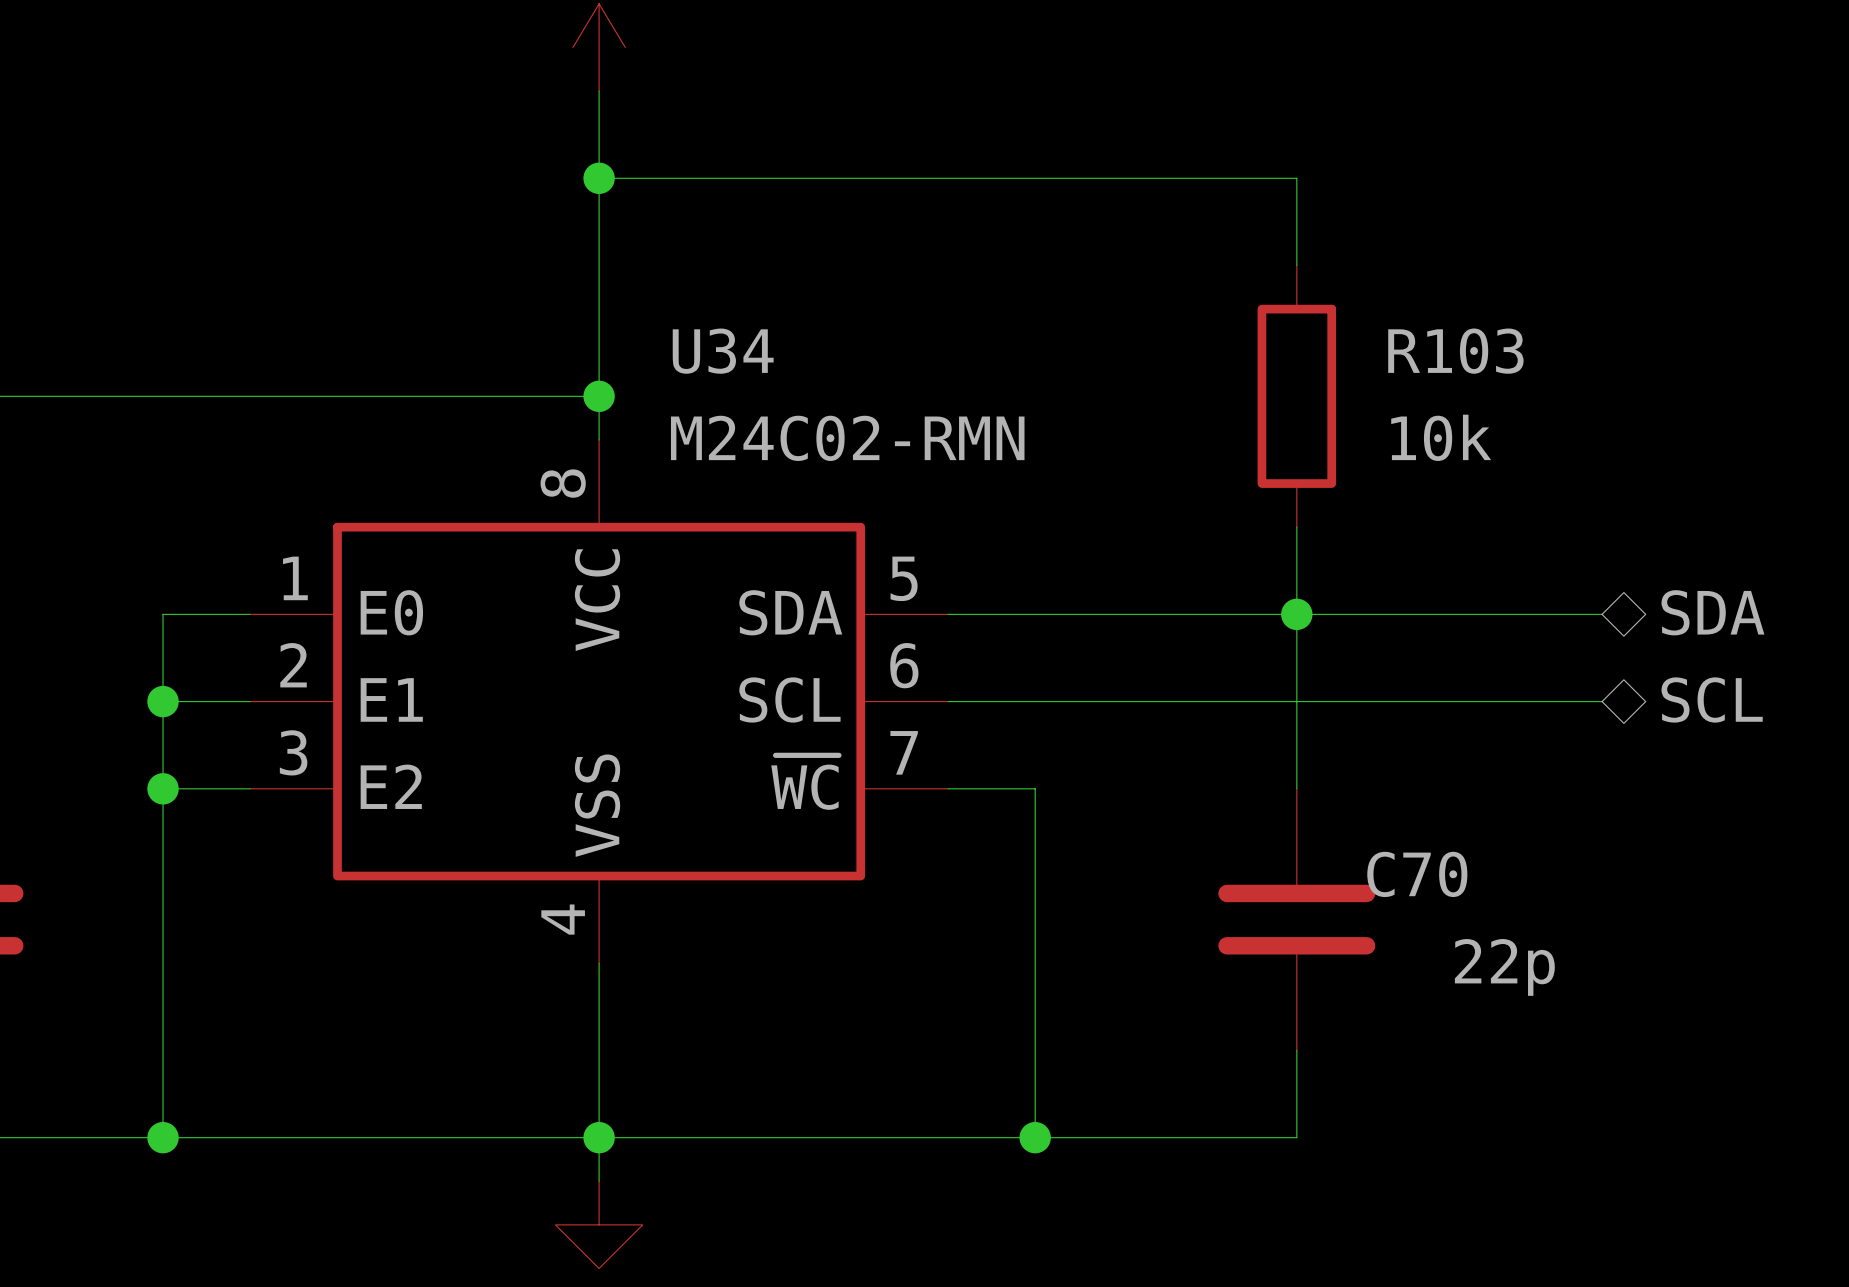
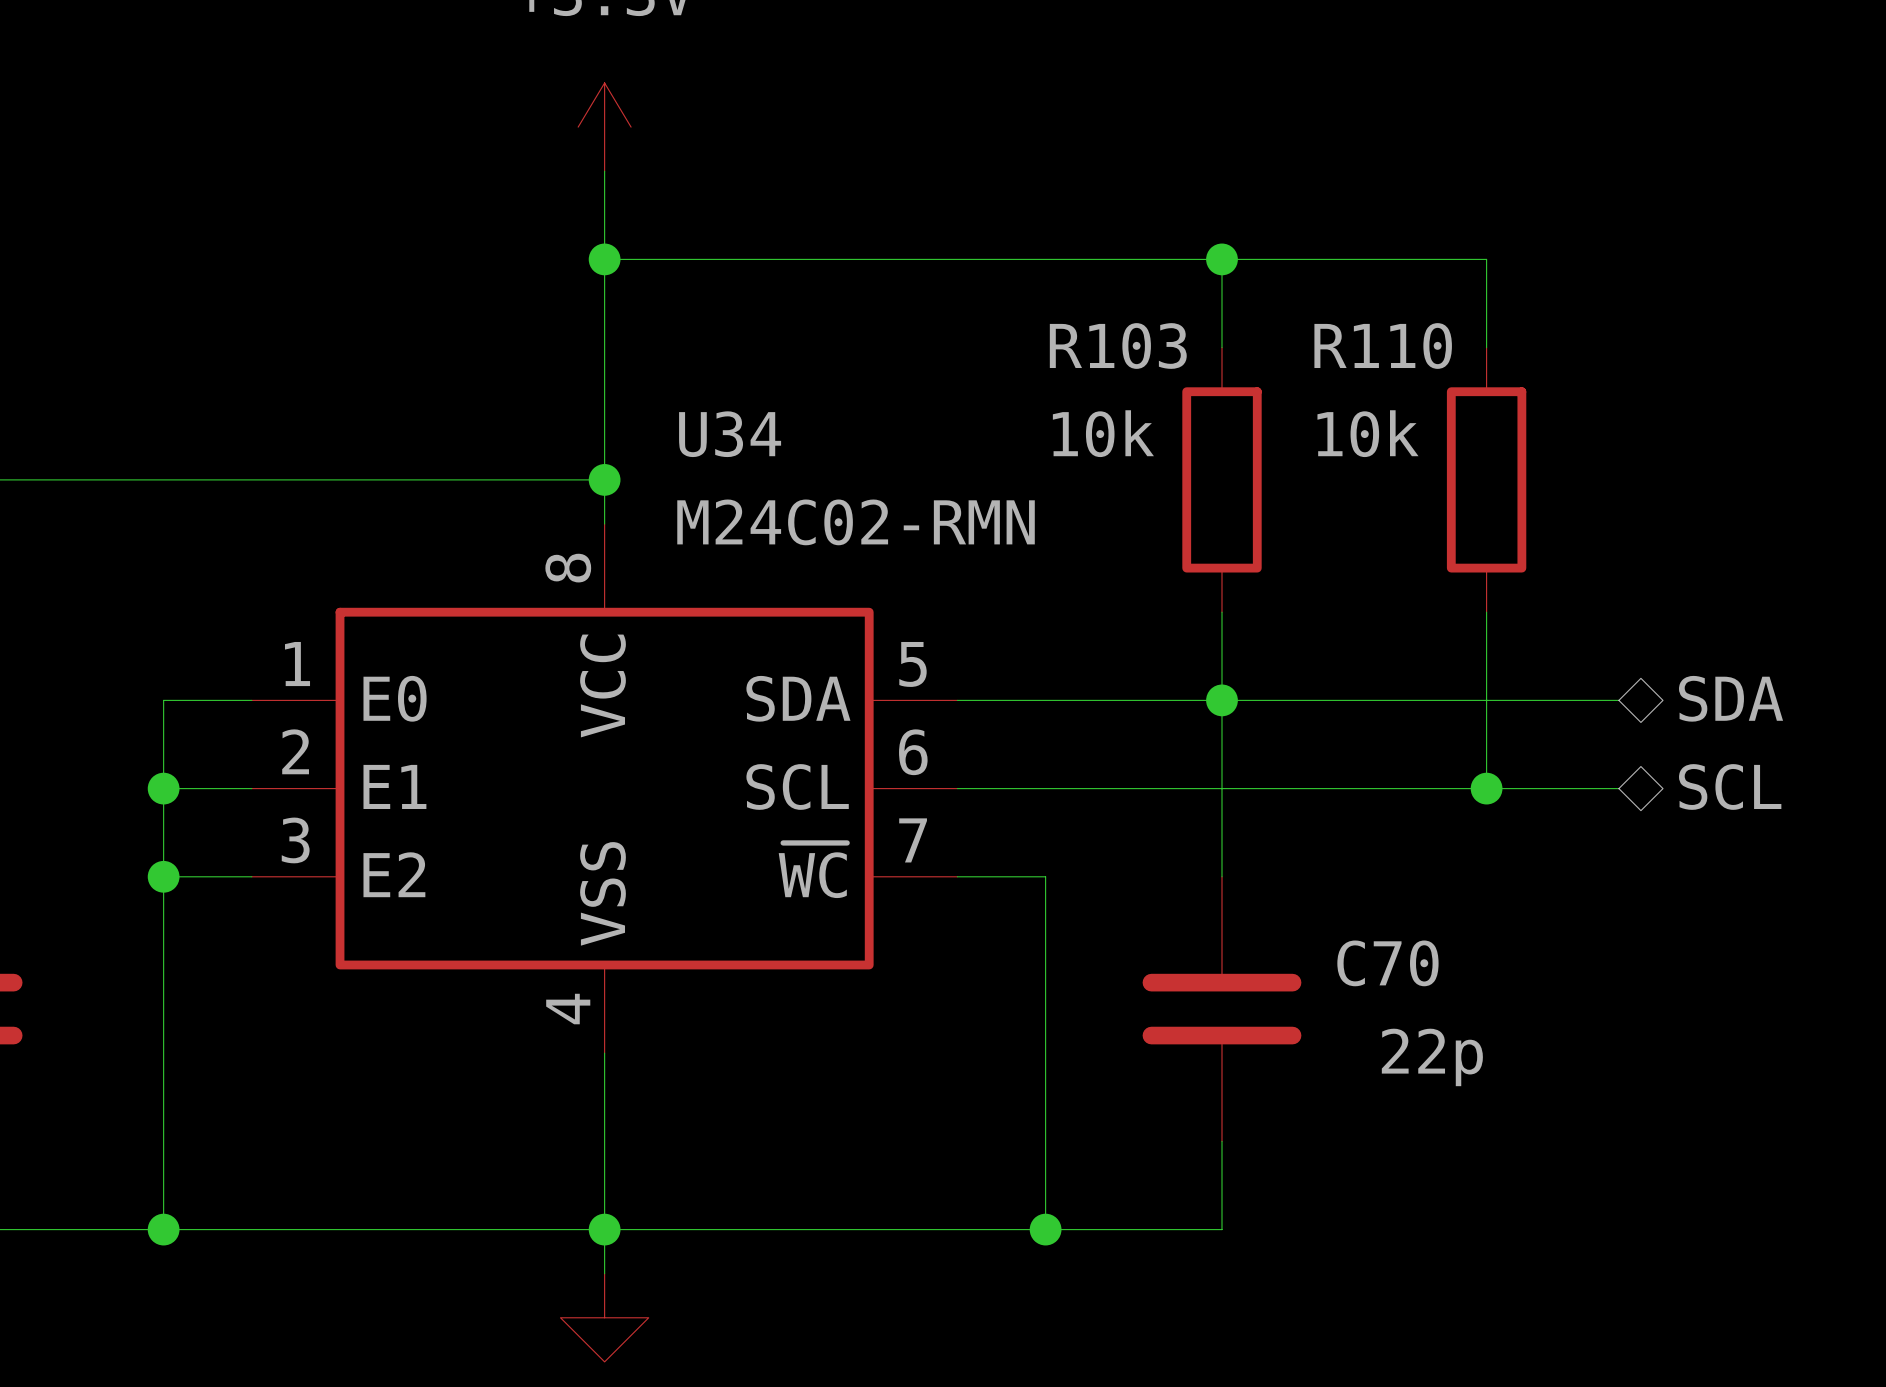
wire: none -> (1222, 259) (1222, 347)
junction: none -> (1222, 259)
wire: (1296, 178) (1296, 265) -> (1310, 259) (1486, 259) (1486, 347)
R103 name position: R103 (1455, 351) -> R103 (1118, 345)
R103 position: (1296, 396) -> (1222, 479)
R110: none -> 10k (1486, 479)
R103 value position: 10k (1441, 437) -> 10k (1103, 433)
wire: (1296, 527) (1296, 788) -> (1222, 612) (1222, 876)
wire: none -> (1486, 612) (1486, 788)
junction position: (1296, 614) -> (1222, 700)
junction: none -> (1486, 788)
C70 name position: C70 (1417, 874) -> C70 (1387, 963)
C70 position: (1296, 919) -> (1222, 1009)
wire: (1296, 1050) (1296, 1137) (1209, 1137) -> (1222, 1141) (1222, 1229)

